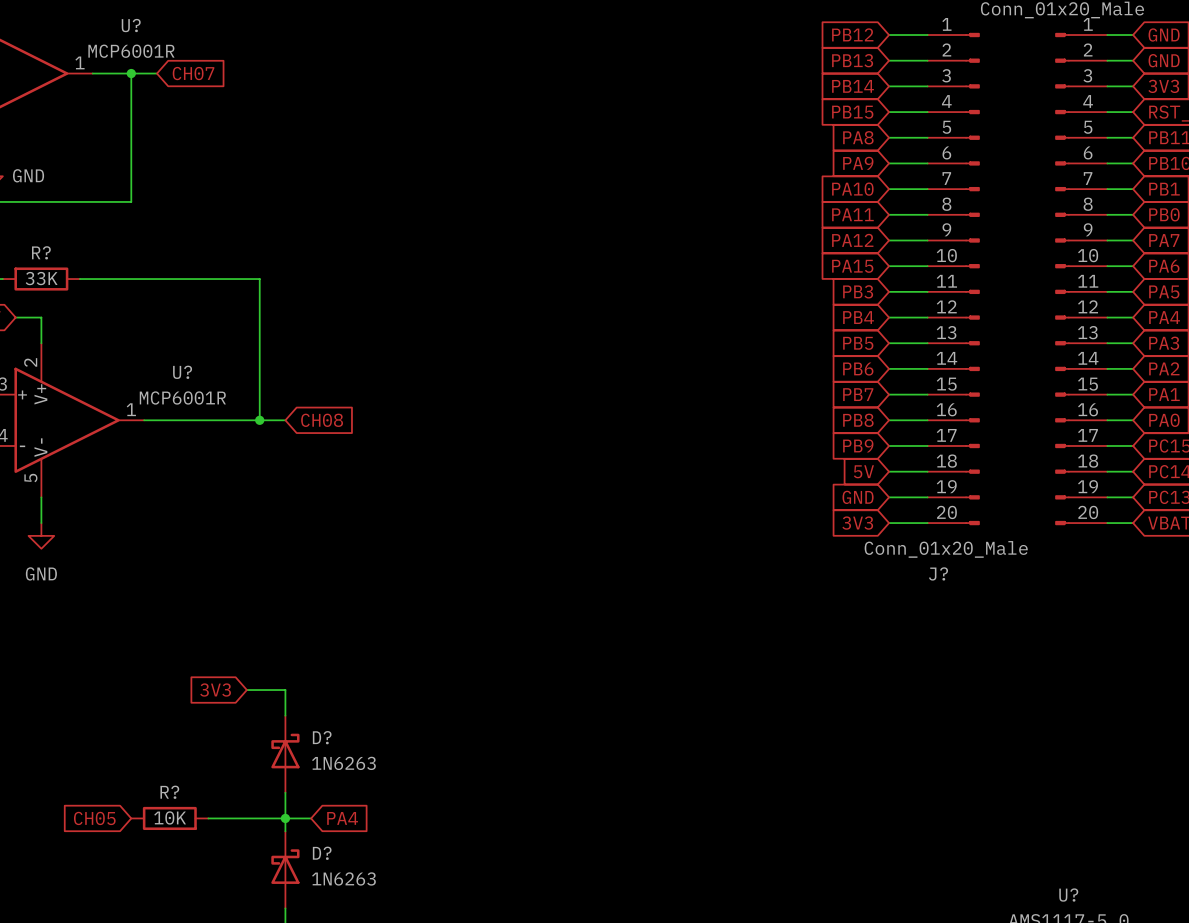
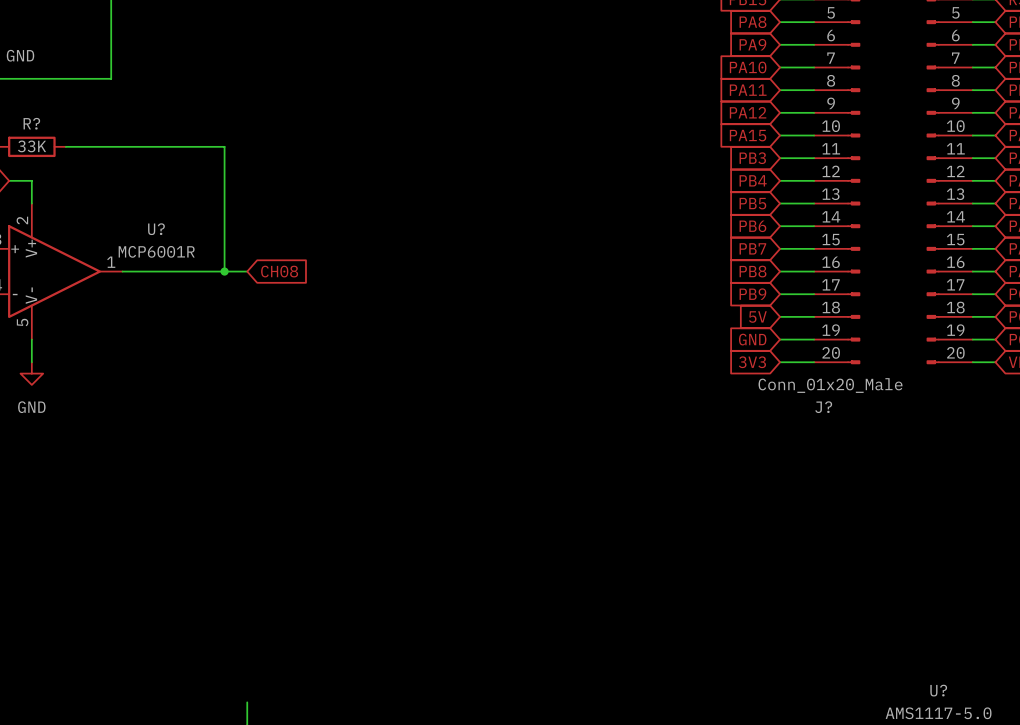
global label: 3V3 (215, 690) -> none
wire: (246, 690) (285, 690) (285, 715) -> none
D?: 1N6263 (285, 754) -> none
wire: (285, 792) (285, 831) -> none
global label: CH05 (94, 818) -> none
R?: 10K (169, 818) -> none
wire: (208, 818) (311, 818) -> none
junction: (285, 818) -> none
global label: PA4 (342, 818) -> none
D?: 1N6263 (285, 869) -> none

